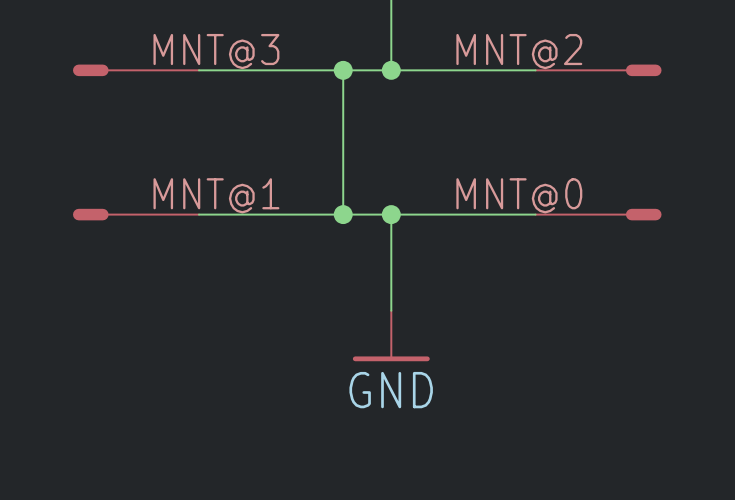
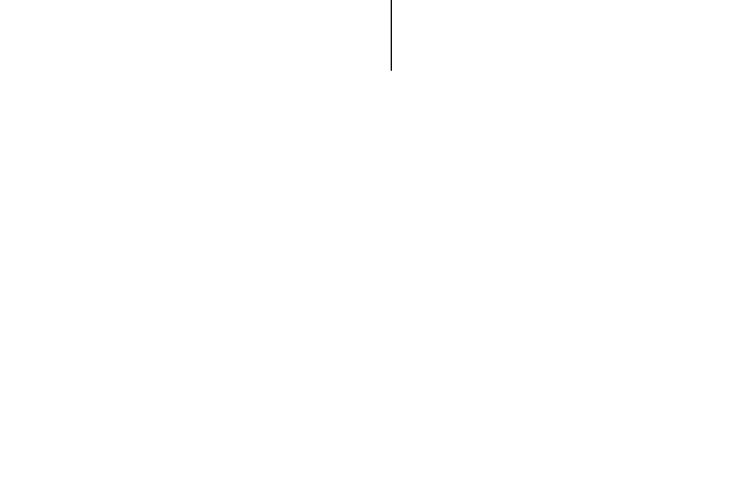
part: (135, 70) -> none
wire: (198, 70) (535, 70) -> none
wire: (343, 70) (343, 214) -> none
junction: (343, 70) -> none
junction: (391, 70) -> none
part: (598, 70) -> none
part: (135, 214) -> none
wire: (198, 214) (535, 214) -> none
junction: (343, 214) -> none
wire: (391, 214) (391, 310) -> none
junction: (391, 214) -> none
part: (598, 214) -> none
power symbol: GND (391, 336) -> none

